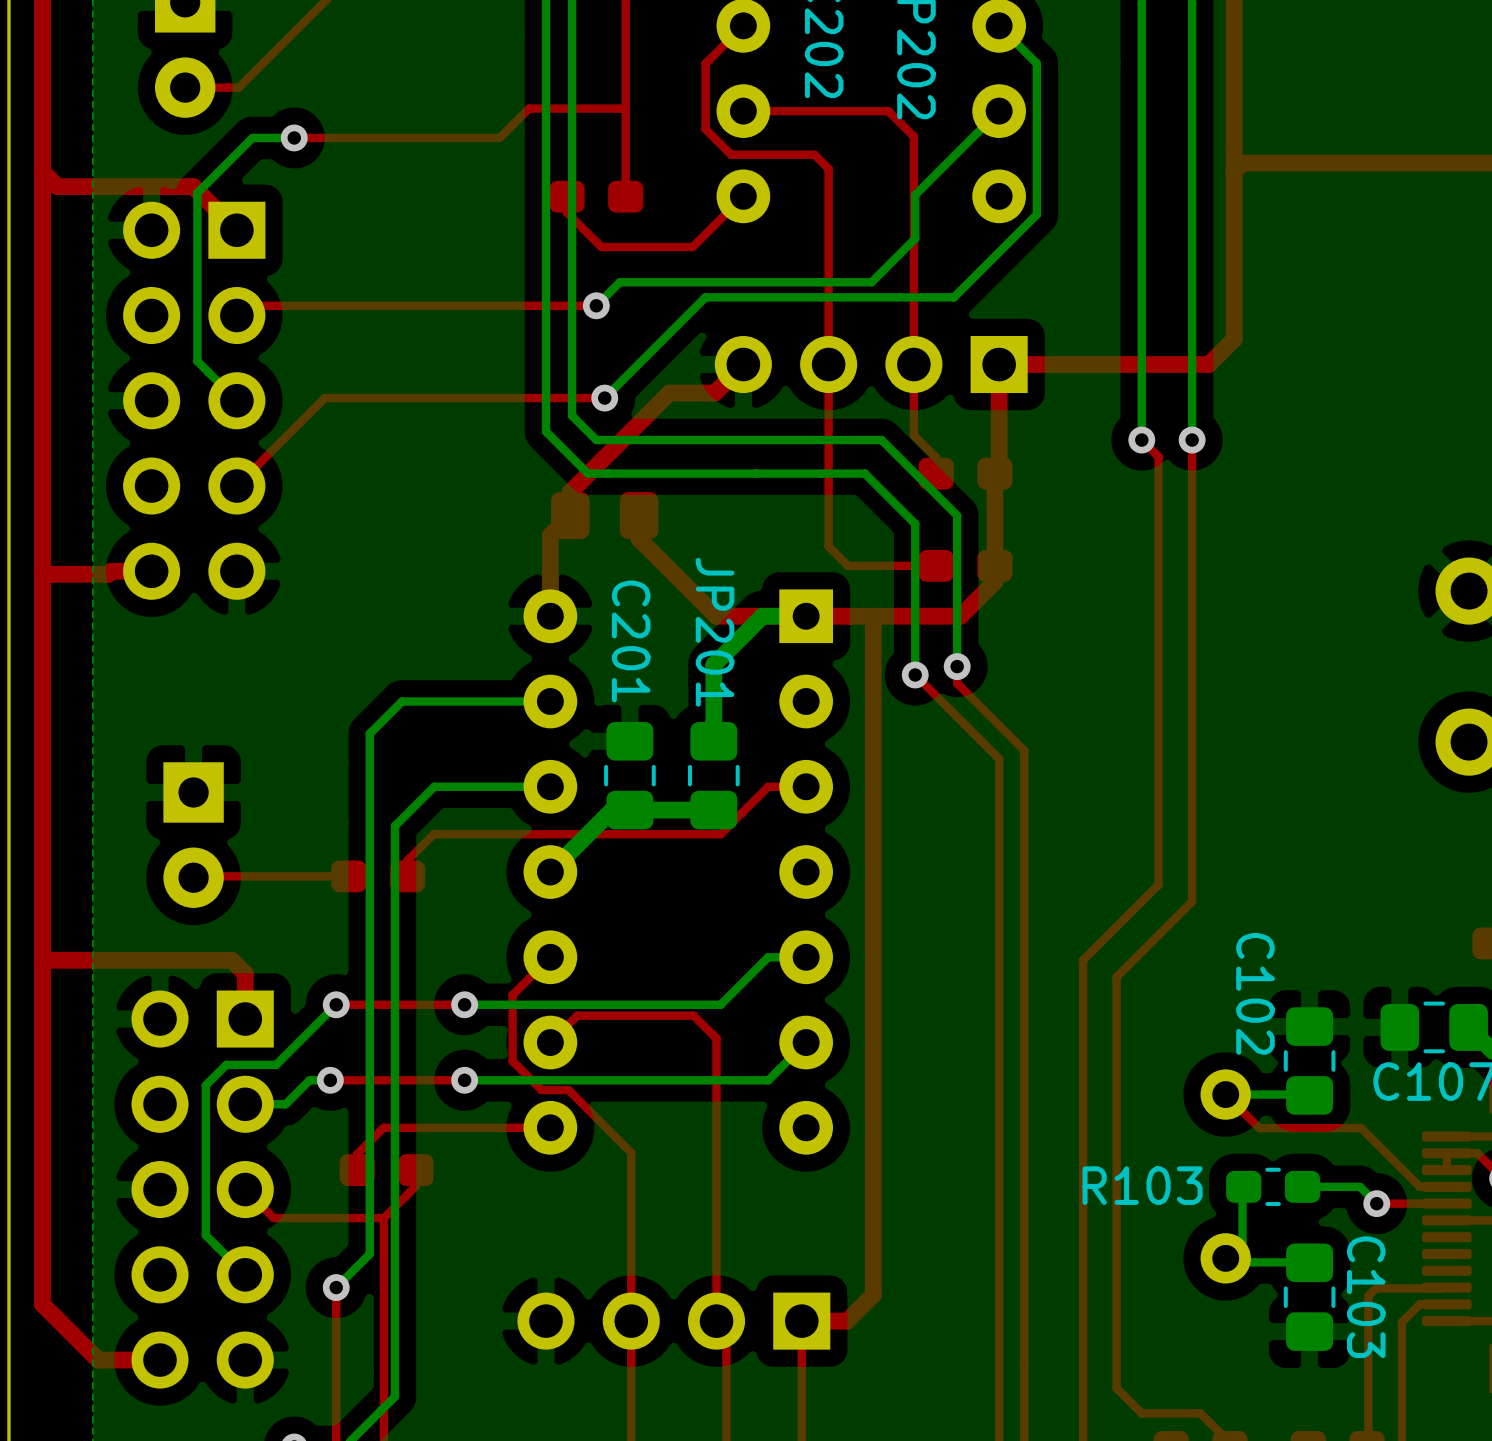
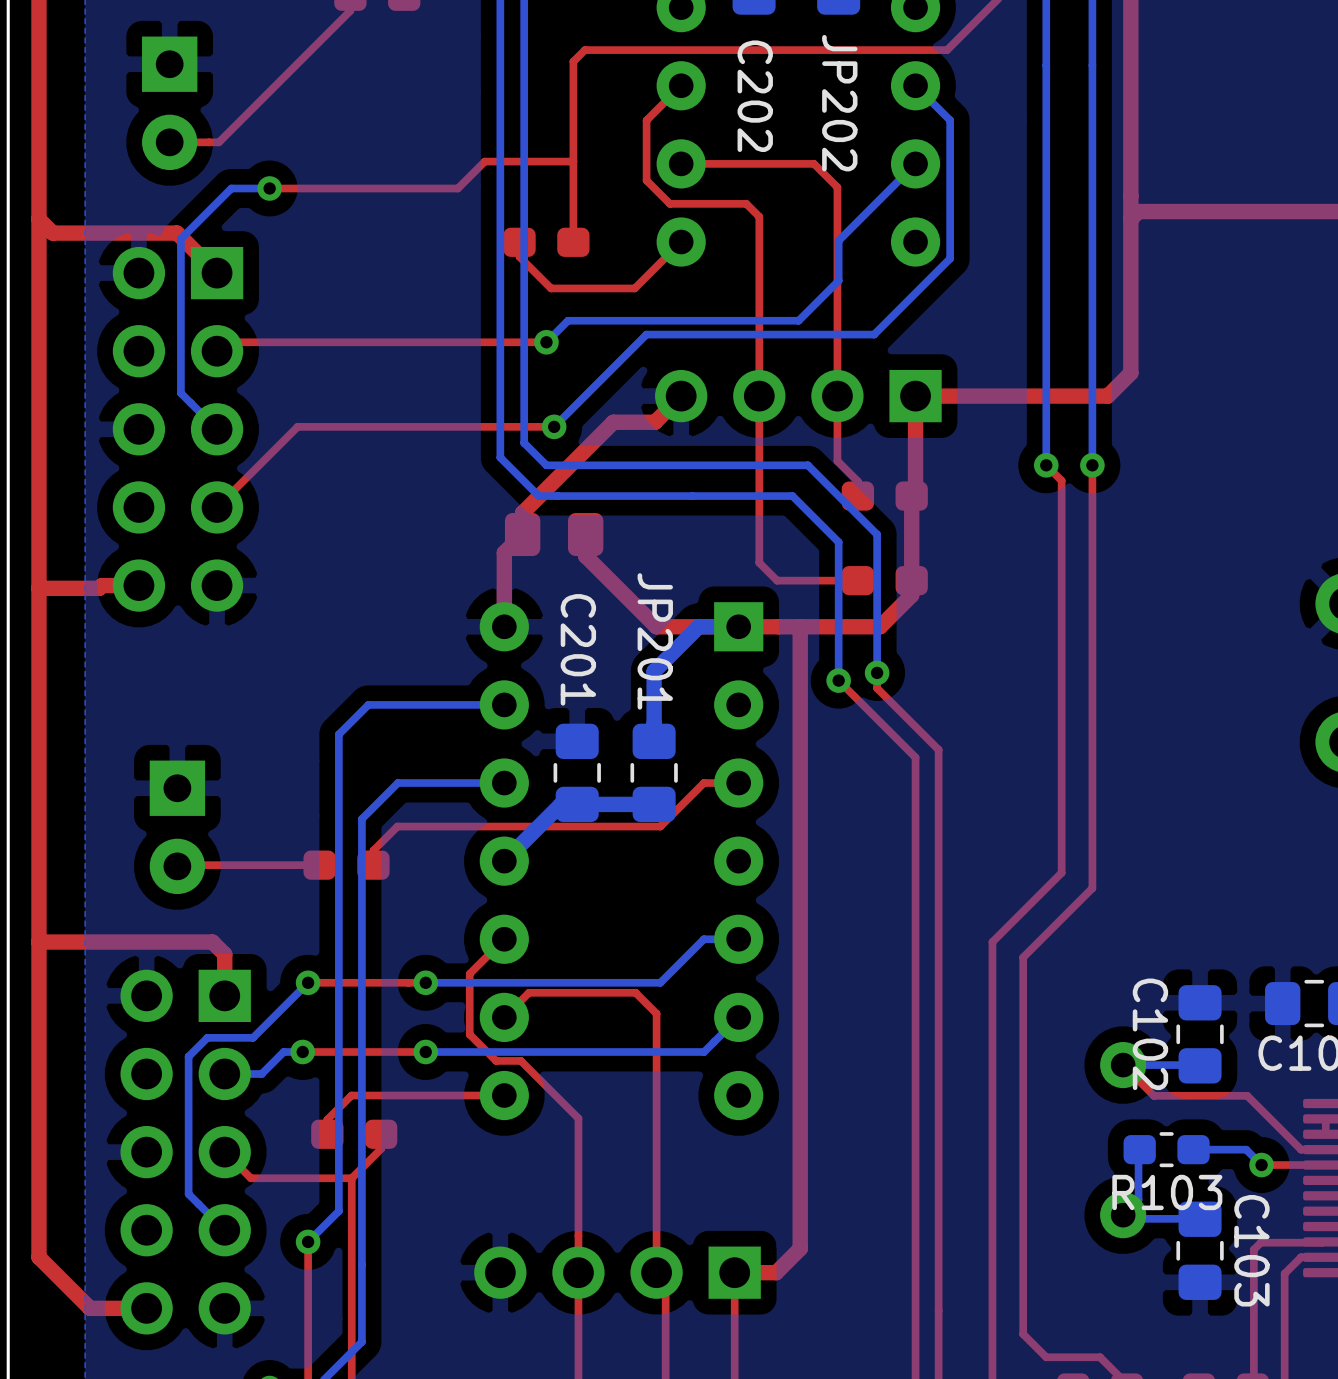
C102 name position: C102 (1255, 993) -> C102 (1150, 1034)
R103 name position: R103 (1142, 1185) -> R103 (1167, 1192)

